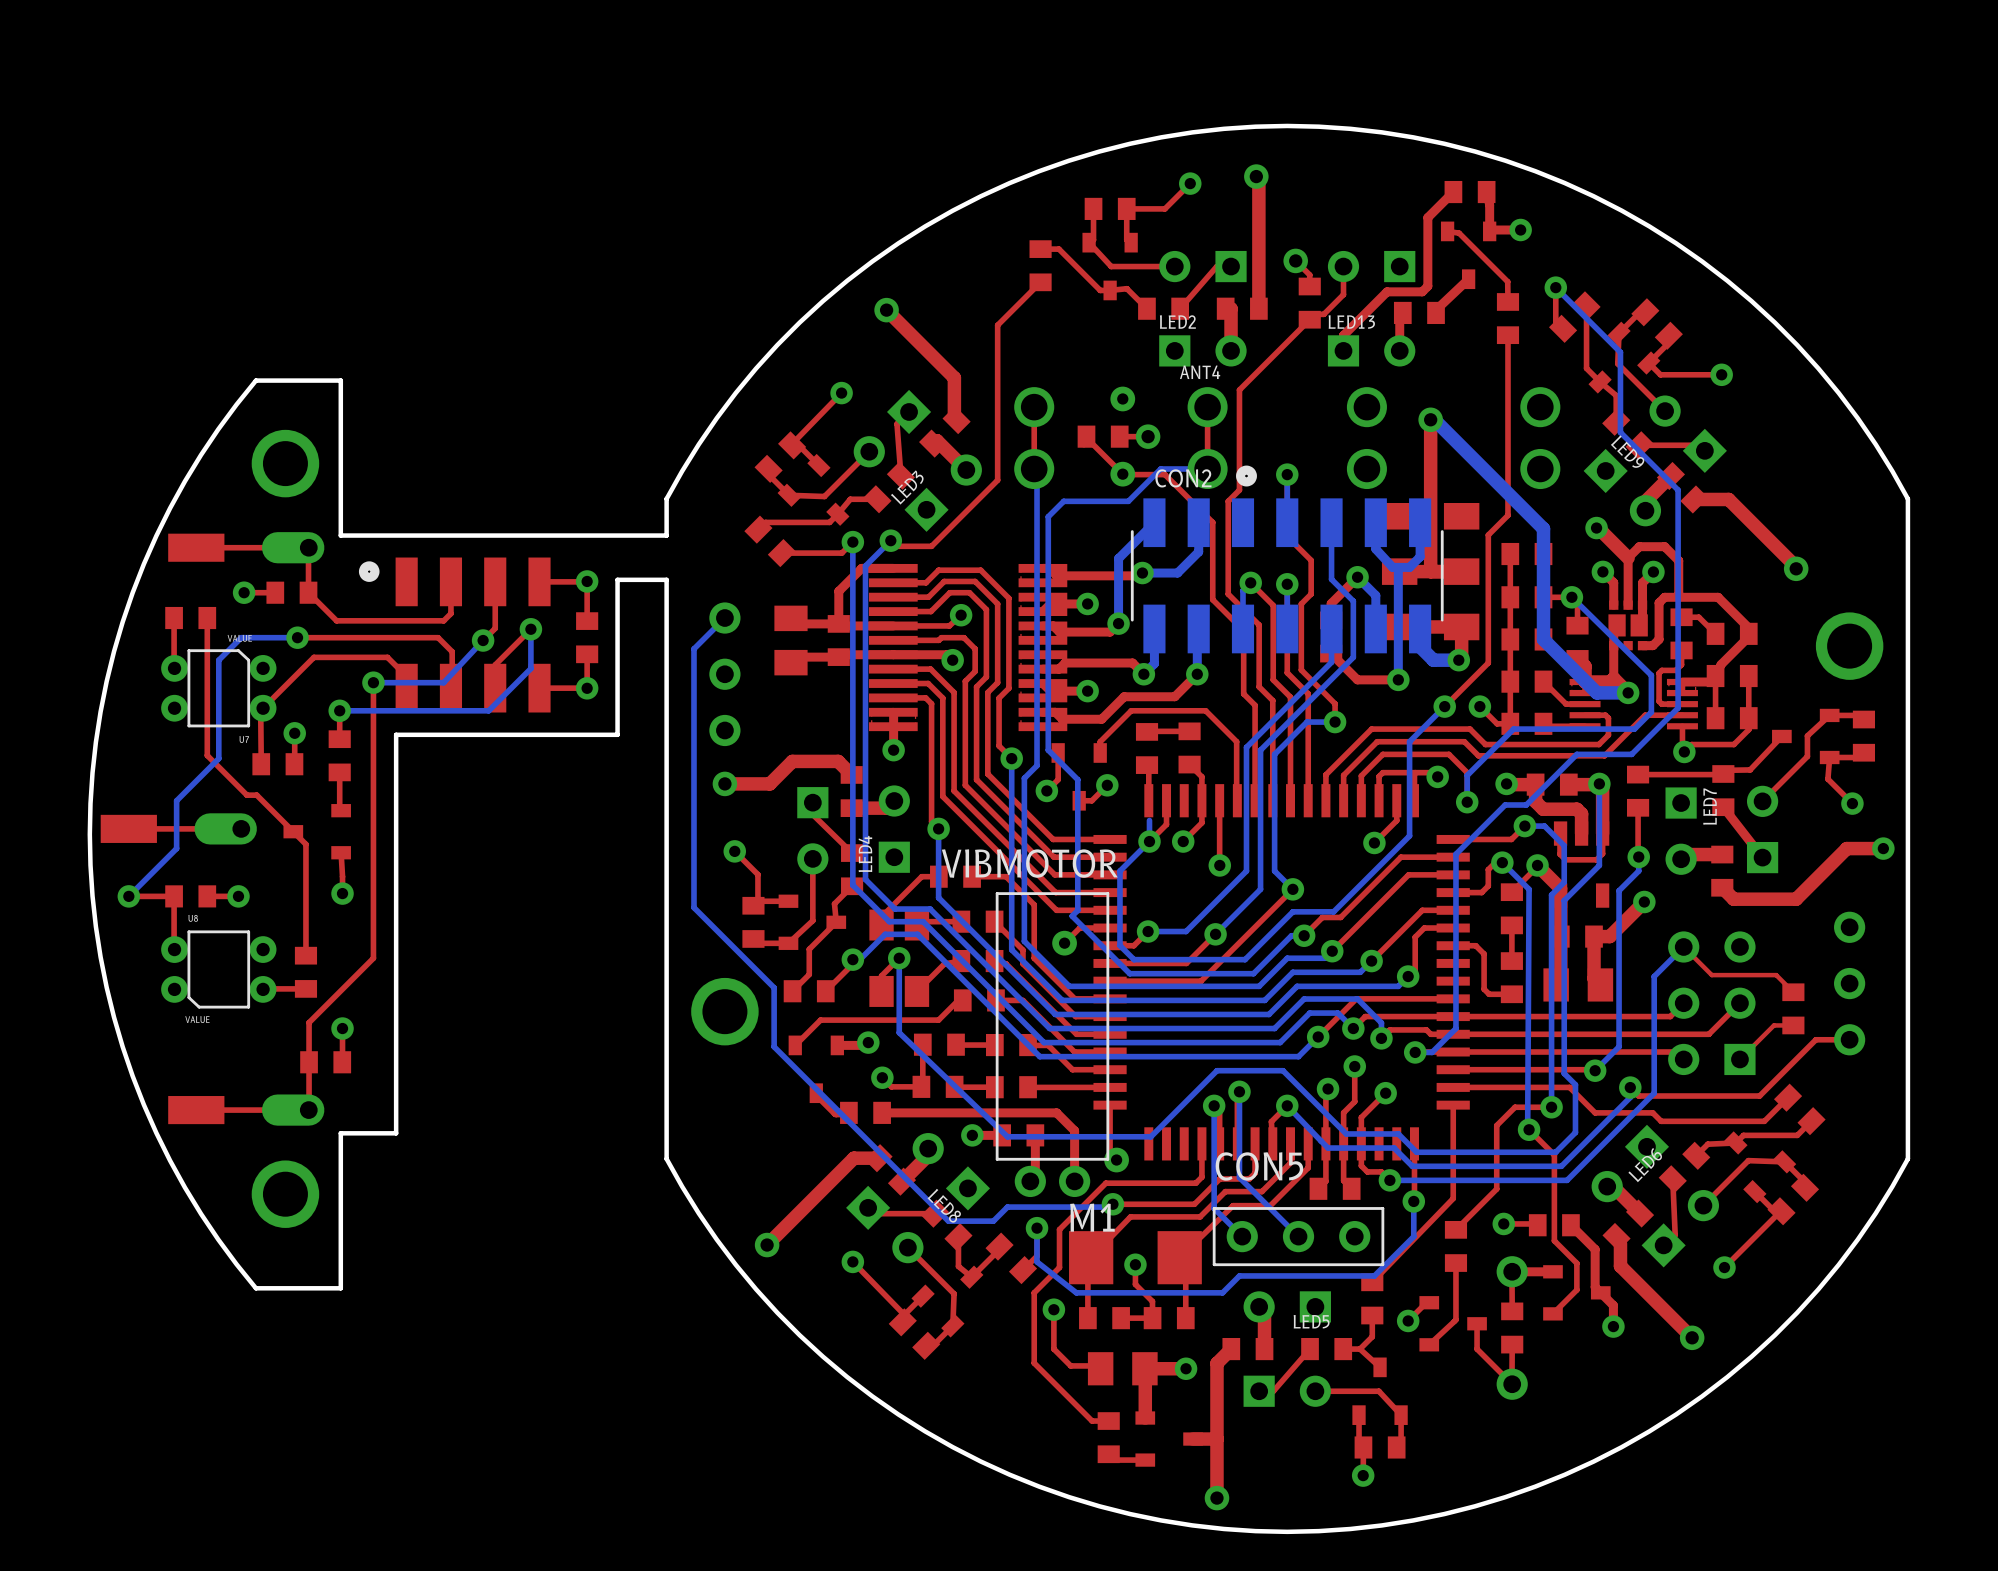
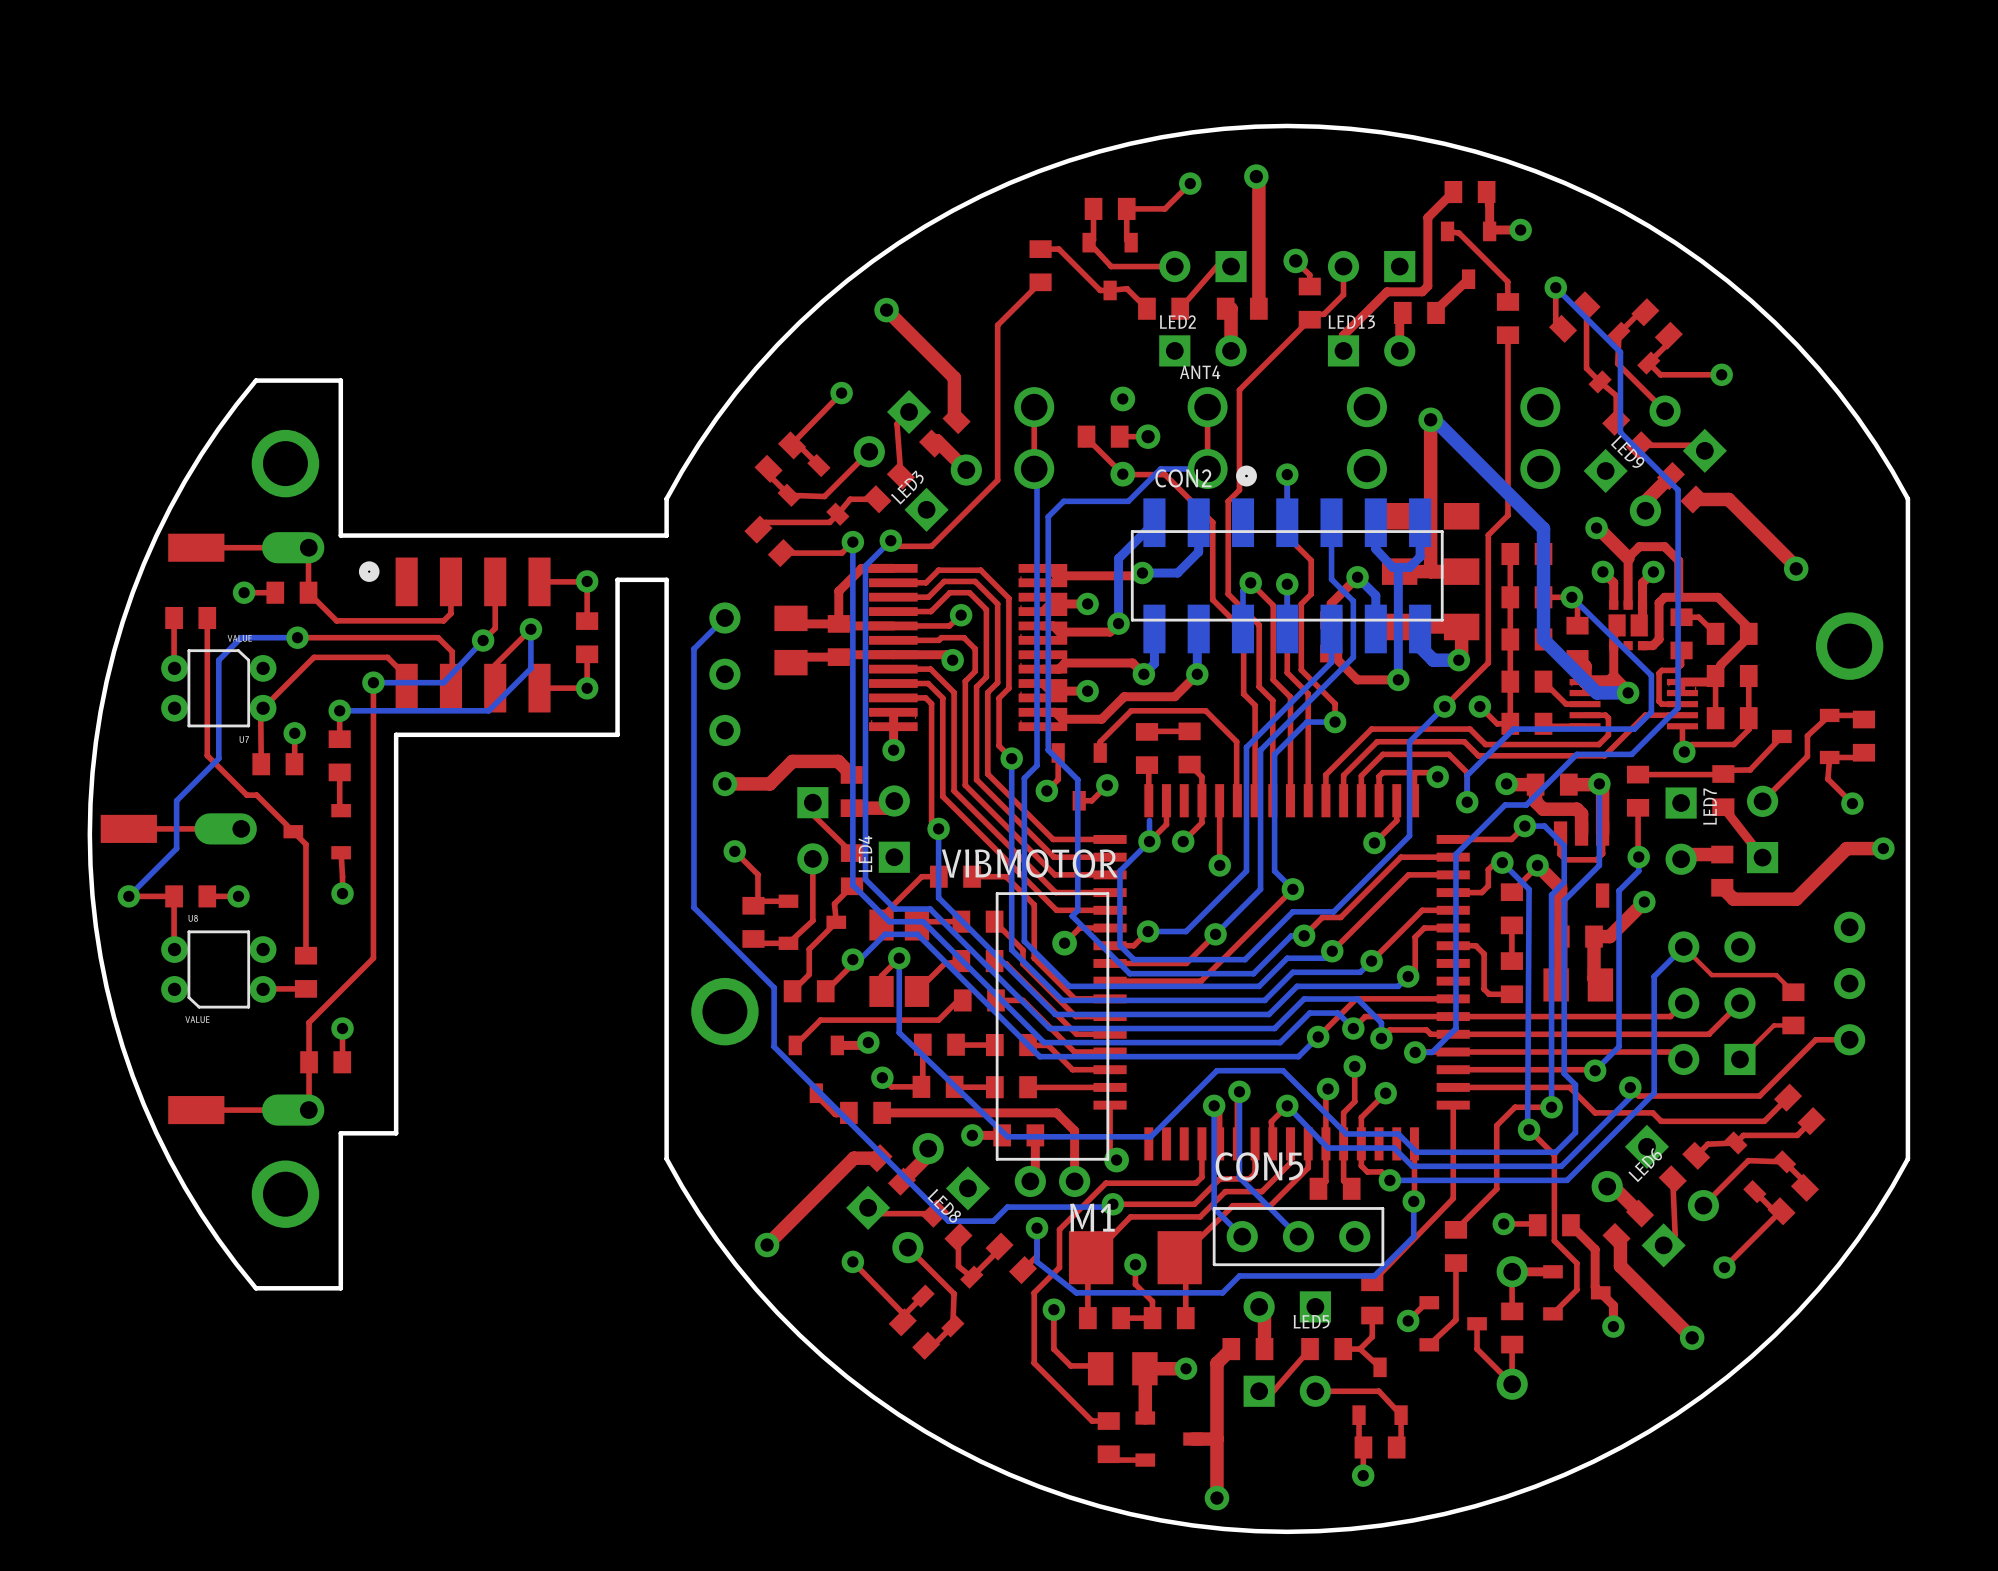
CON2 footprint: [1130, 498, 1444, 654] -> [1130, 498, 1444, 654]

